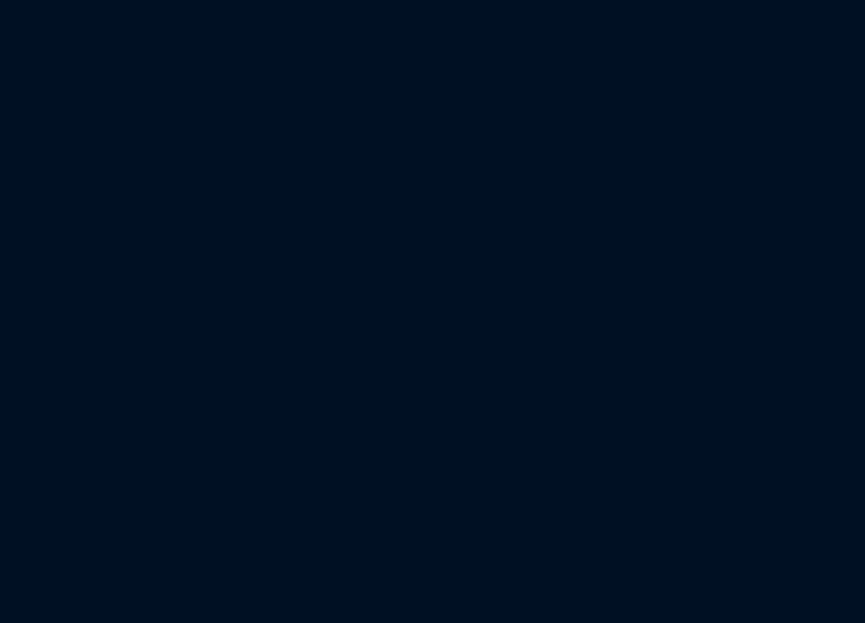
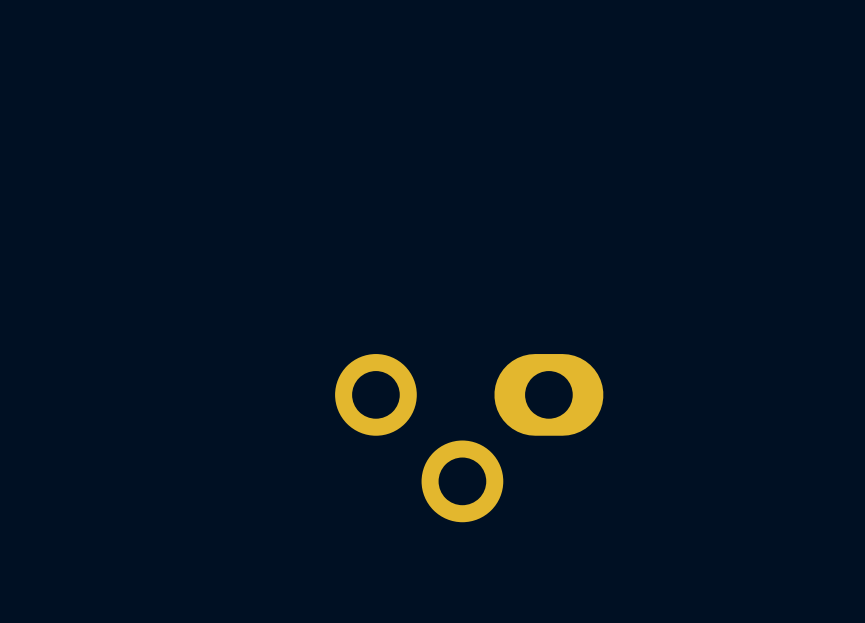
part: none -> (469, 438)

